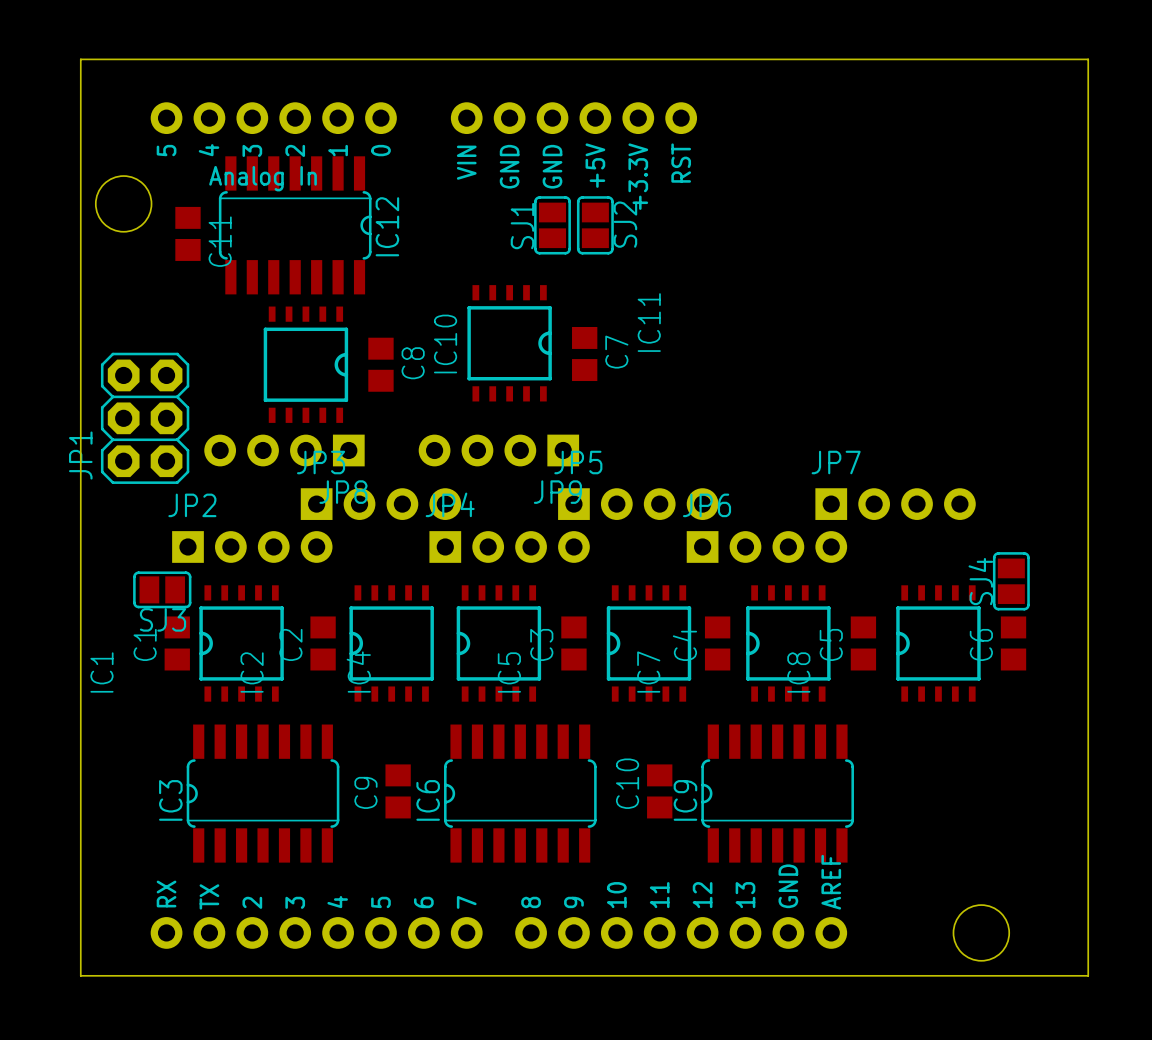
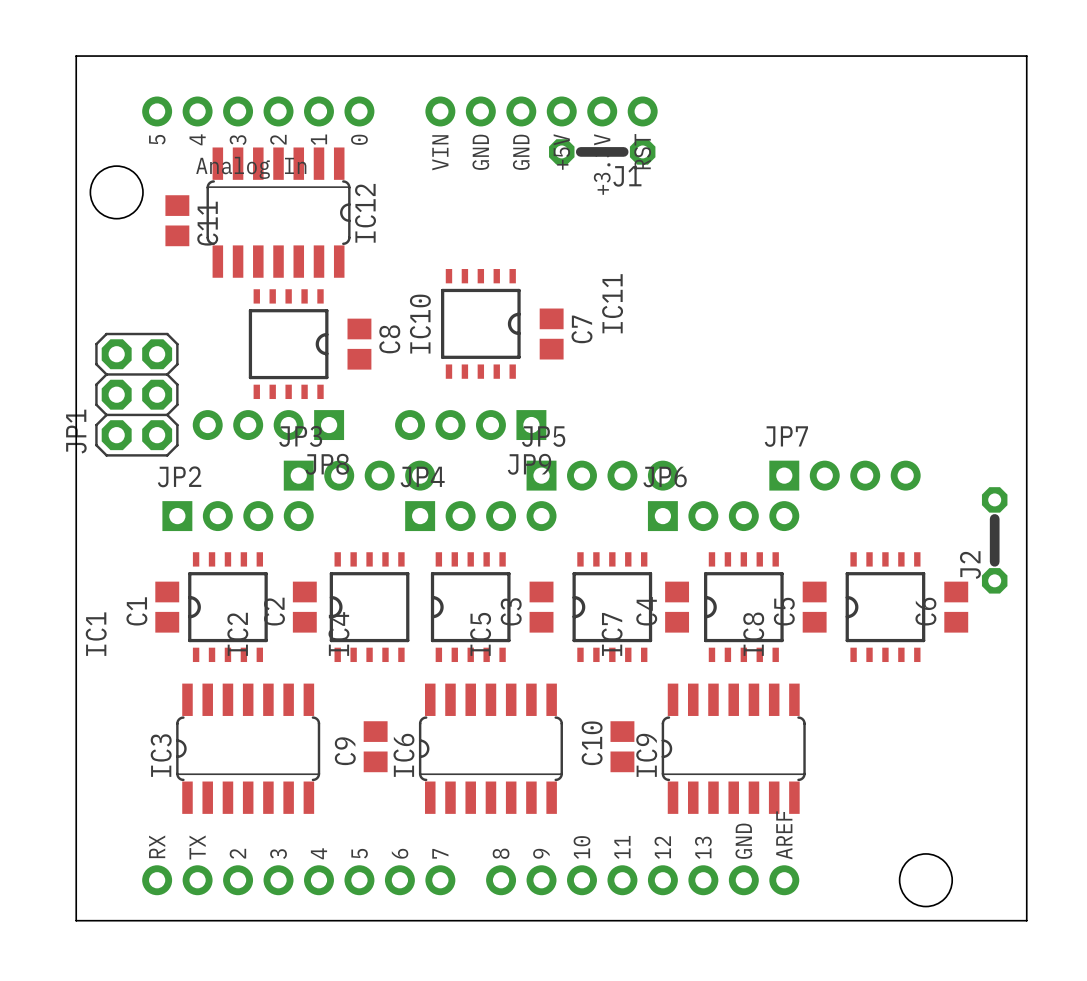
J1: none -> (602, 151)
SJ1: (552, 225) -> none
SJ2: (595, 225) -> none
J2: none -> (994, 540)
SJ4: (1011, 581) -> none
SJ3: (162, 589) -> none

